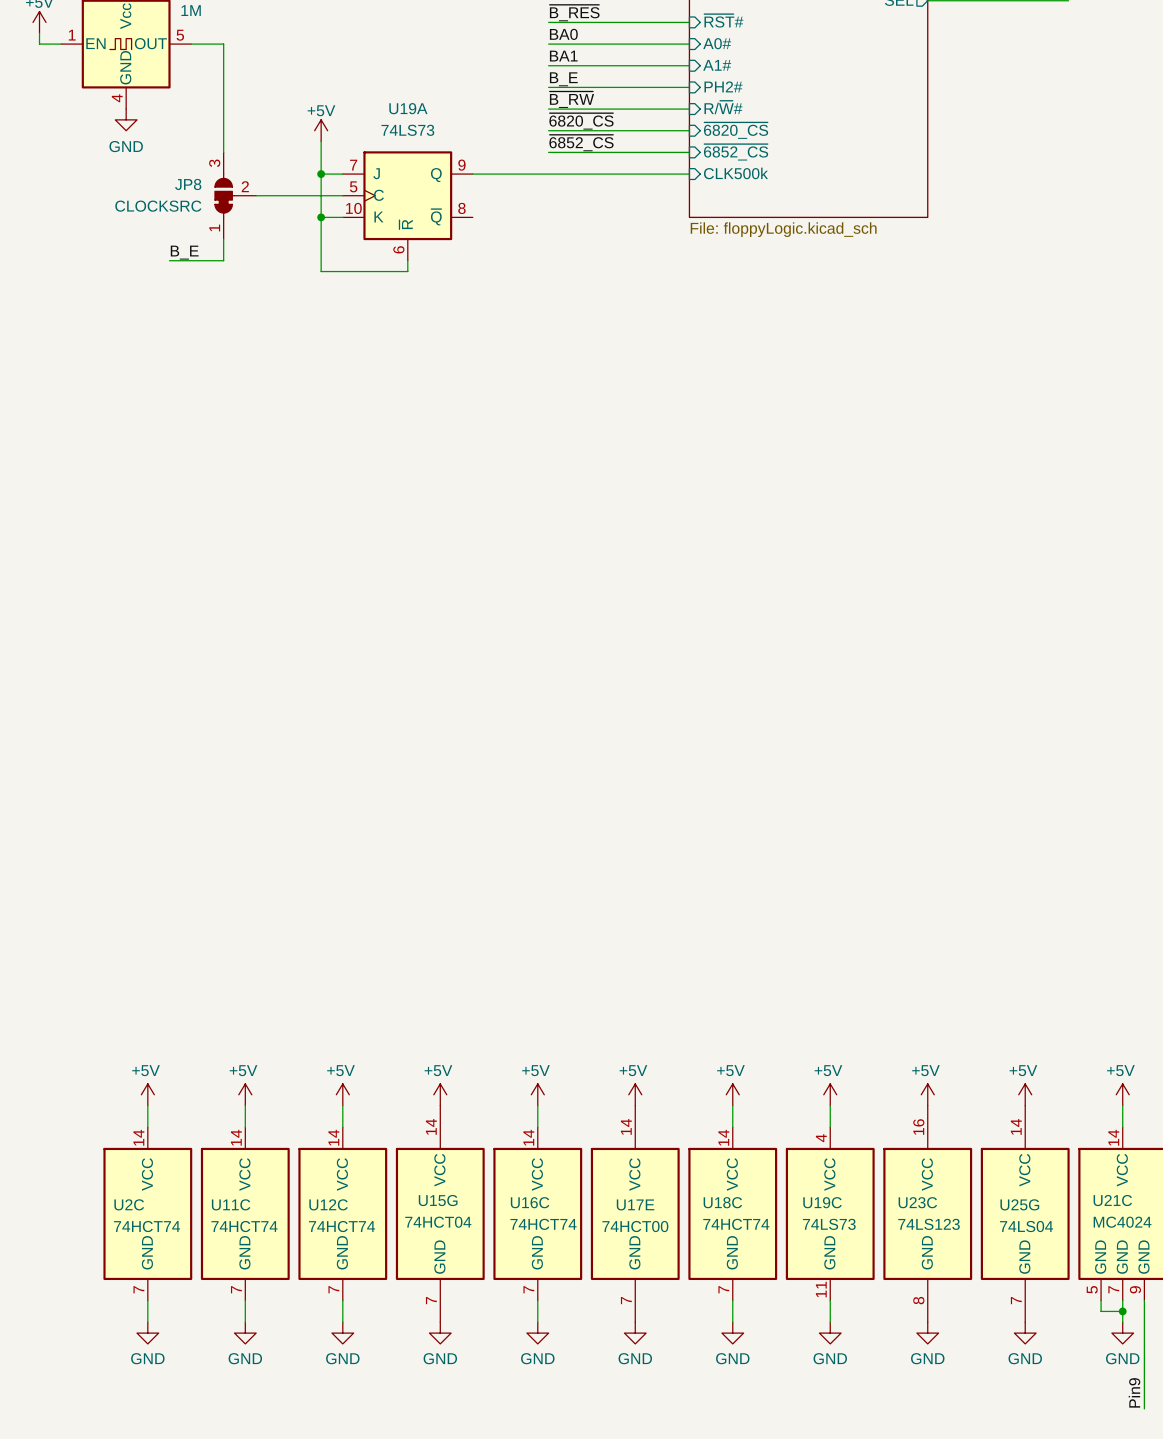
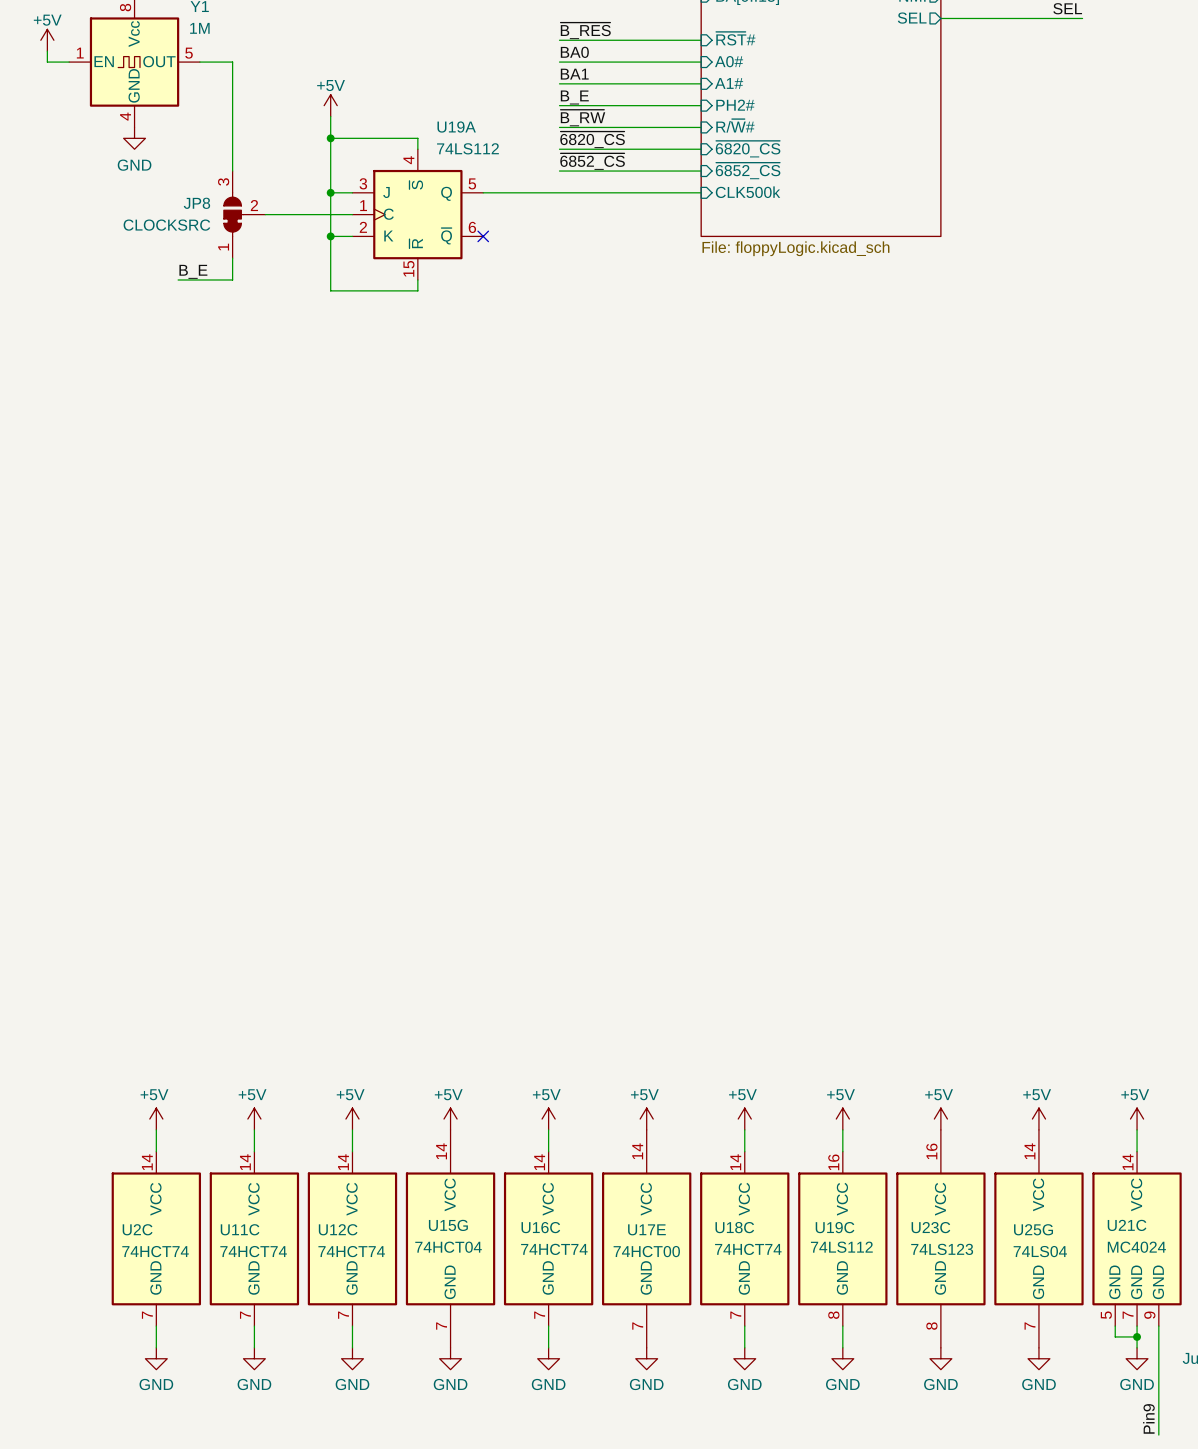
U19A name position: U19A (408, 108) -> U19A (456, 127)
wire: none -> (330, 138) (417, 138) (417, 149)
junction: none -> (330, 138)
power symbol position: +5V (321, 130) -> +5V (330, 105)
U19A value: 74LS73 (407, 130) -> 74LS112 (467, 148)
U19A symbol: [342, 151, 473, 261] -> [352, 149, 484, 280]
no-connect mark: none -> (483, 236)
U19C pin number: 4 (821, 1138) -> 16 (833, 1162)
U19C value: 74LS73 (829, 1224) -> 74LS112 (841, 1247)
U19C pin number: 11 (821, 1289) -> 8 (833, 1315)

